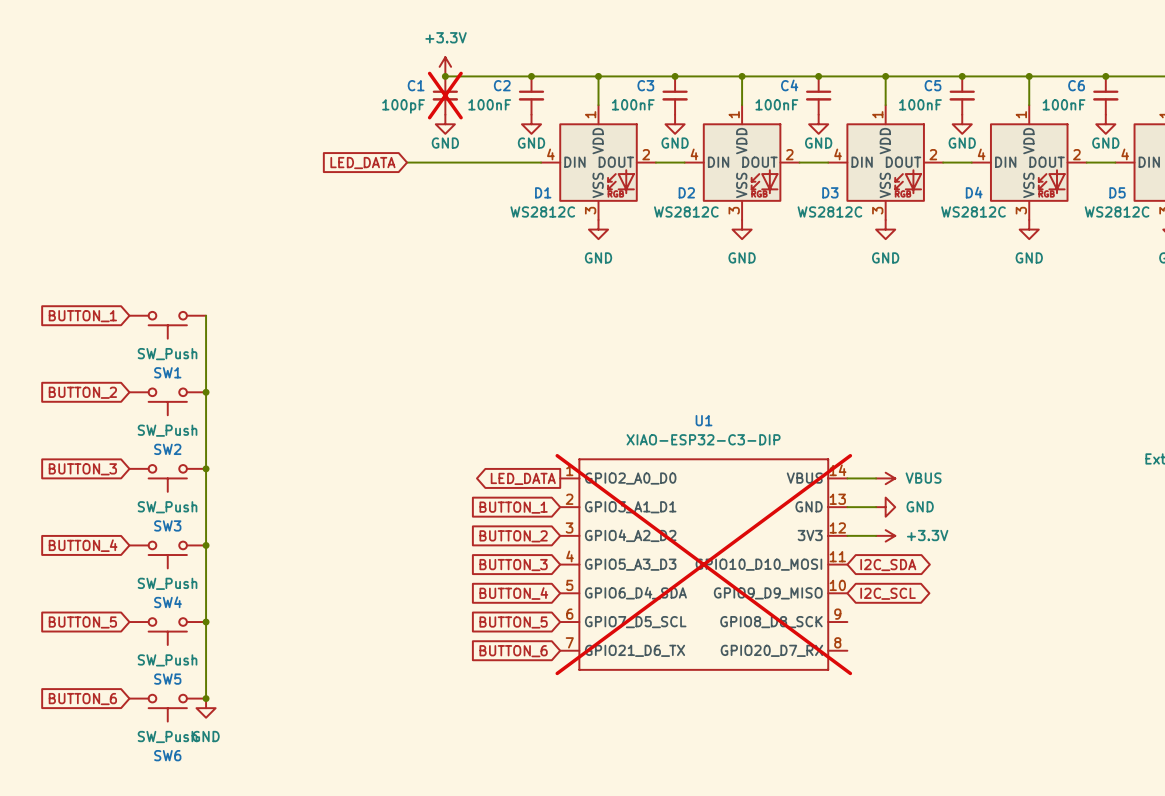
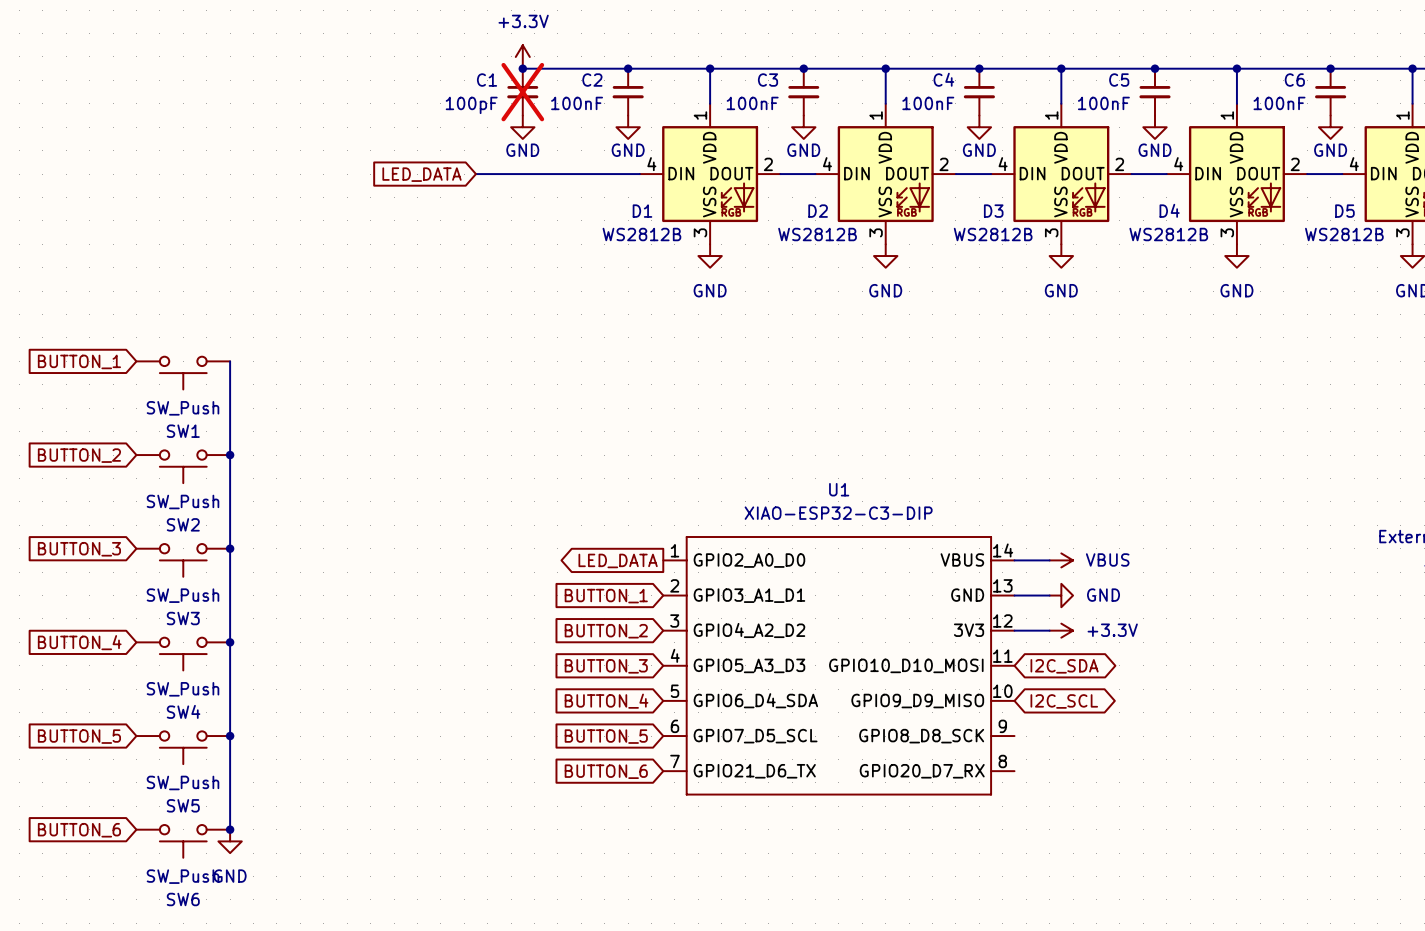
D1 value: WS2812C (542, 211) -> WS2812B (641, 234)
D2 value: WS2812C (686, 211) -> WS2812B (817, 234)
D3 value: WS2812C (829, 211) -> WS2812B (993, 234)
D4 value: WS2812C (973, 211) -> WS2812B (1168, 234)
D5 value: WS2812C (1117, 211) -> WS2812B (1344, 234)
U1 do-not-place cross: (703, 564) -> none

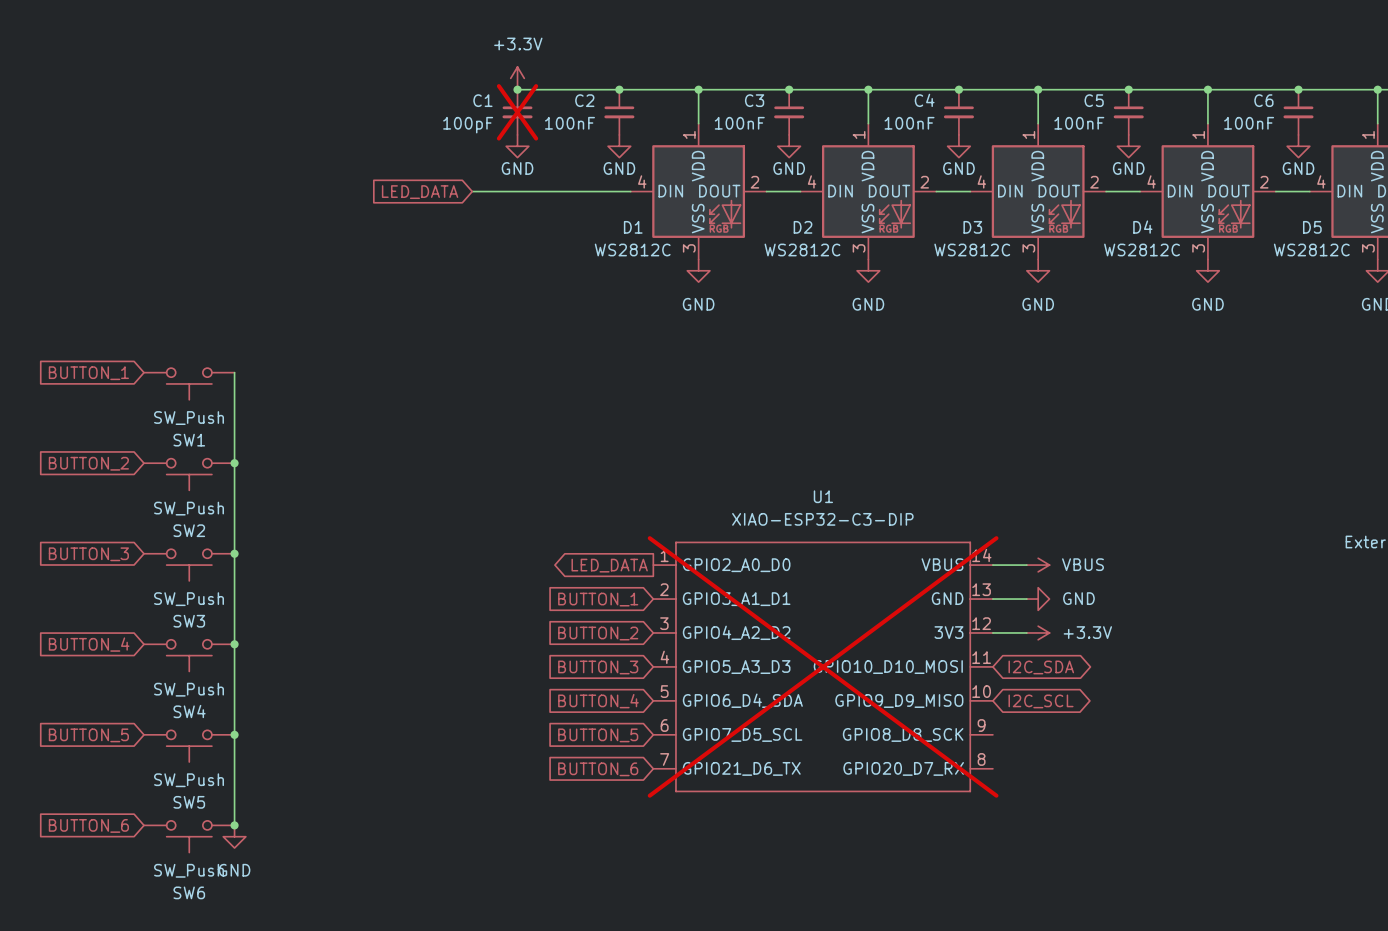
D1 value: WS2812B (641, 234) -> WS2812C (632, 249)
D2 value: WS2812B (817, 234) -> WS2812C (802, 249)
D3 value: WS2812B (993, 234) -> WS2812C (972, 249)
D4 value: WS2812B (1168, 234) -> WS2812C (1142, 249)
D5 value: WS2812B (1344, 234) -> WS2812C (1311, 249)
U1 do-not-place cross: none -> (823, 666)

